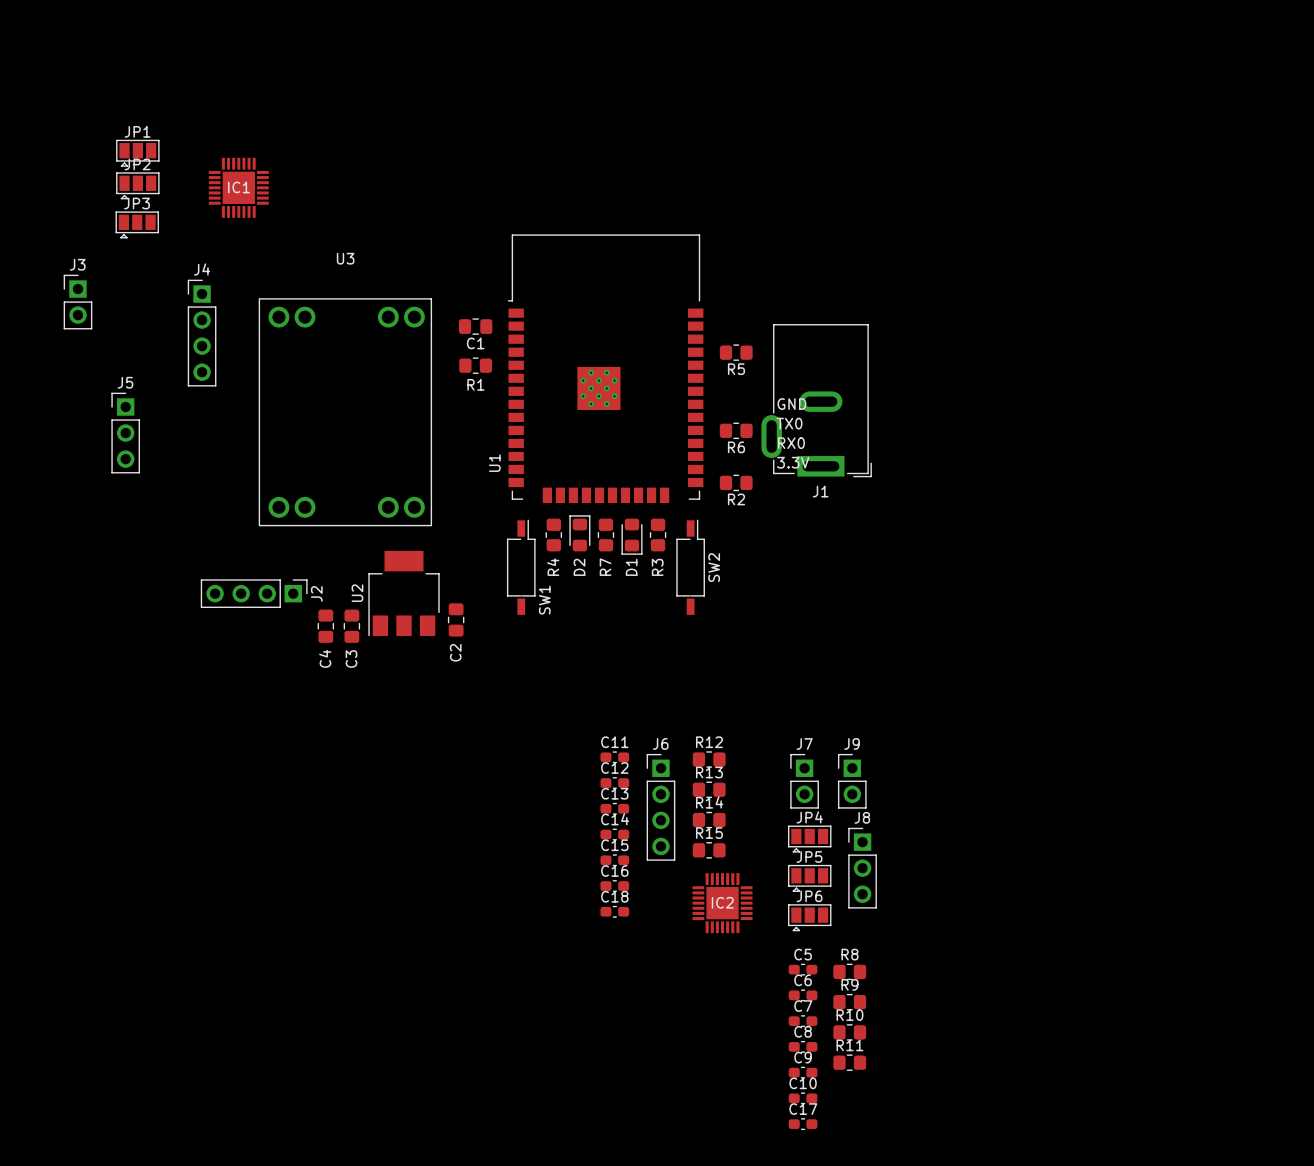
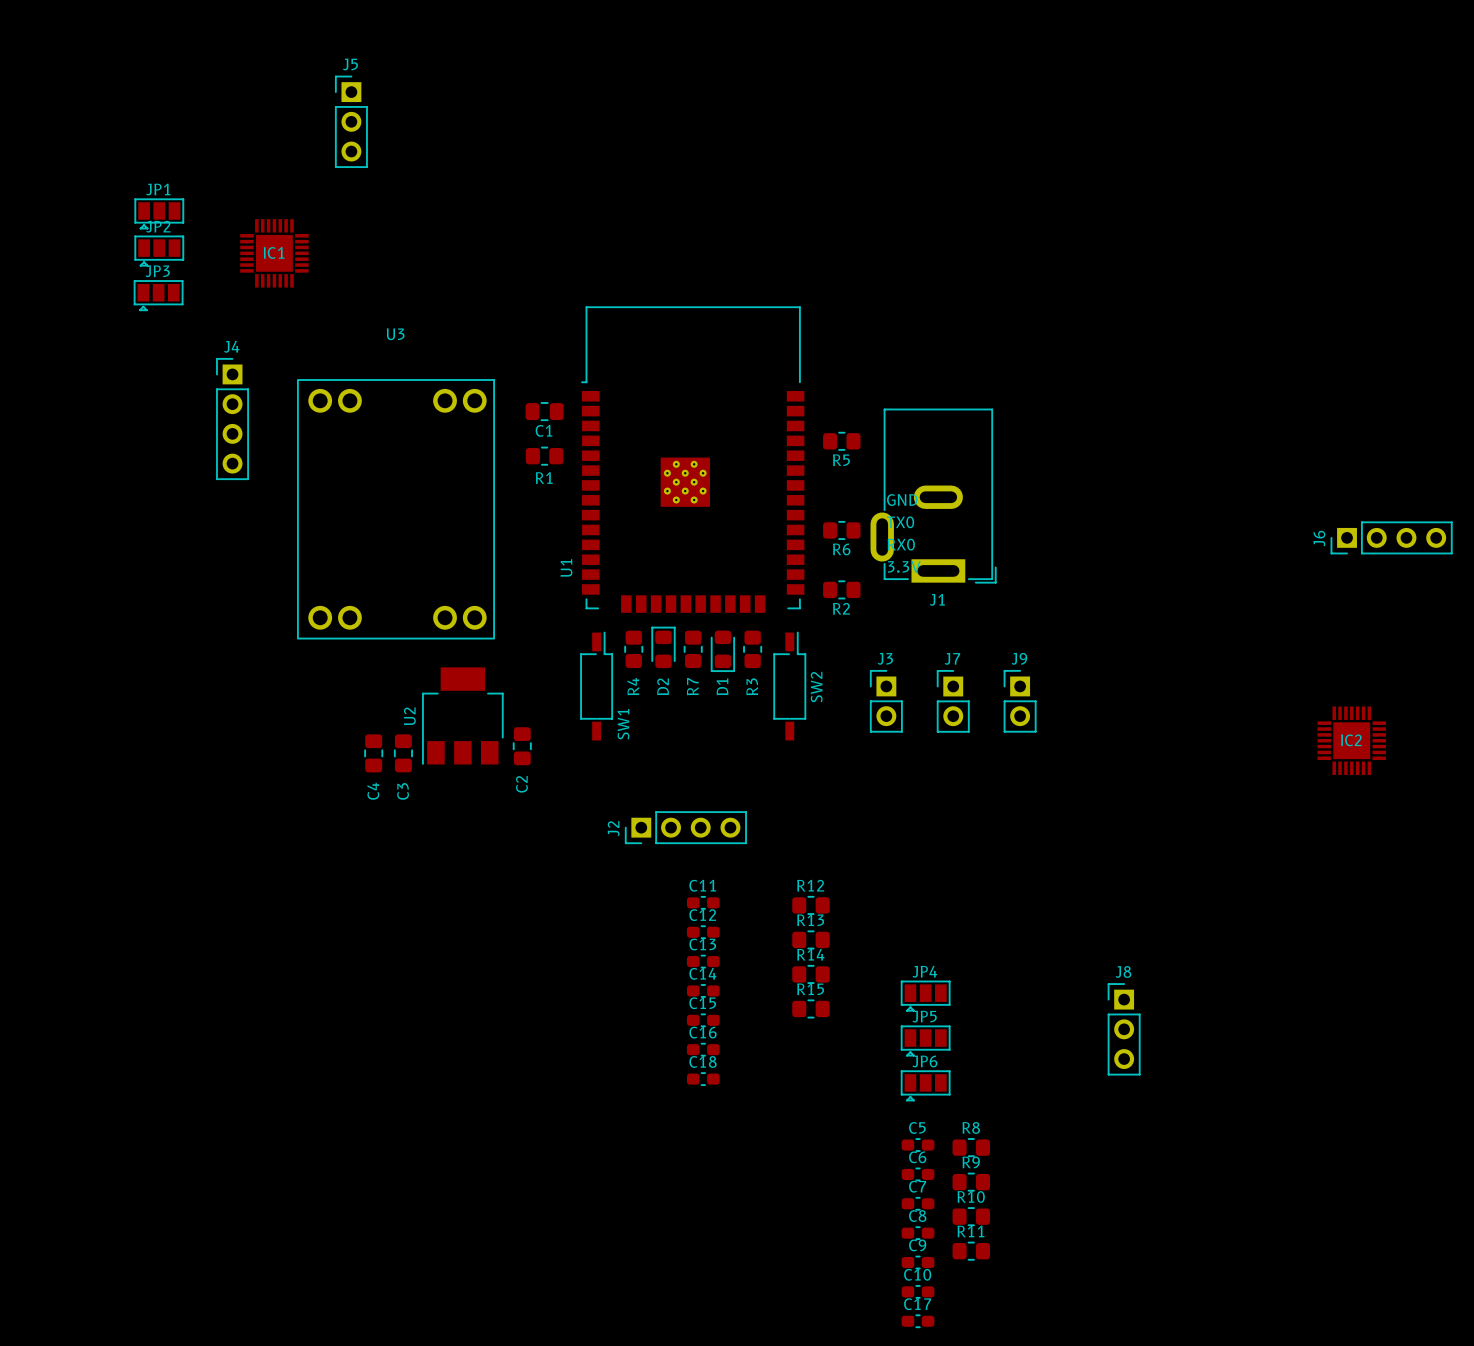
J3 position: (77, 302) -> (886, 701)
J5 position: (125, 433) -> (351, 121)
J2 rotation: 0° (254, 593) -> 180° (685, 827)
J2 position: (254, 593) -> (685, 827)
J7 position: (804, 781) -> (953, 701)
J9 position: (852, 781) -> (1020, 701)
J6 rotation: 0° (660, 807) -> 90° counterclockwise (1391, 537)
J6 position: (660, 807) -> (1391, 537)
J8 position: (862, 868) -> (1124, 1029)
IC2 position: (722, 903) -> (1351, 740)

